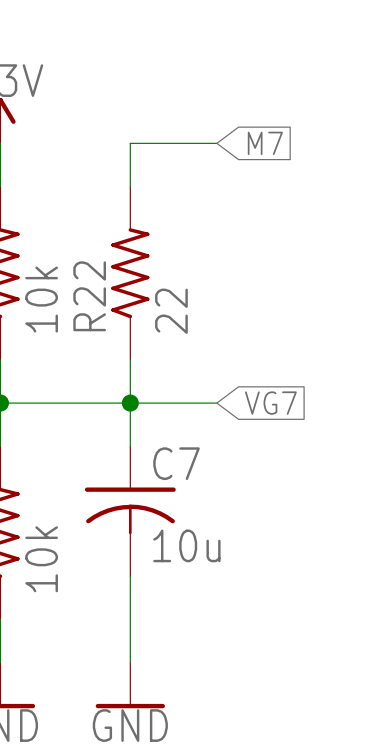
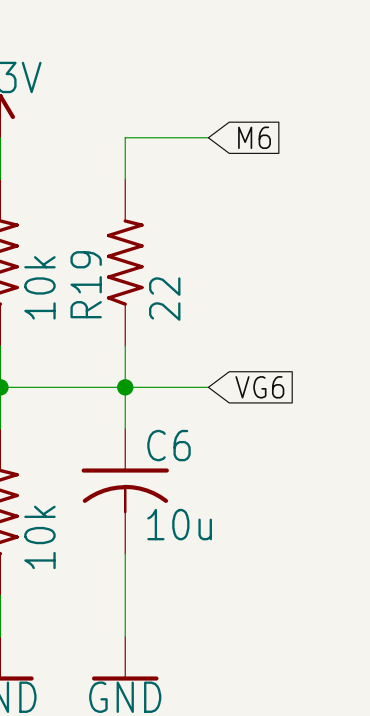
global label: M7 (265, 143) -> M6 (254, 137)
R22 name: R22 (89, 296) -> R19 (86, 284)
global label: VG7 (270, 403) -> VG6 (259, 387)
C7 name: C7 (176, 463) -> C6 (168, 445)

